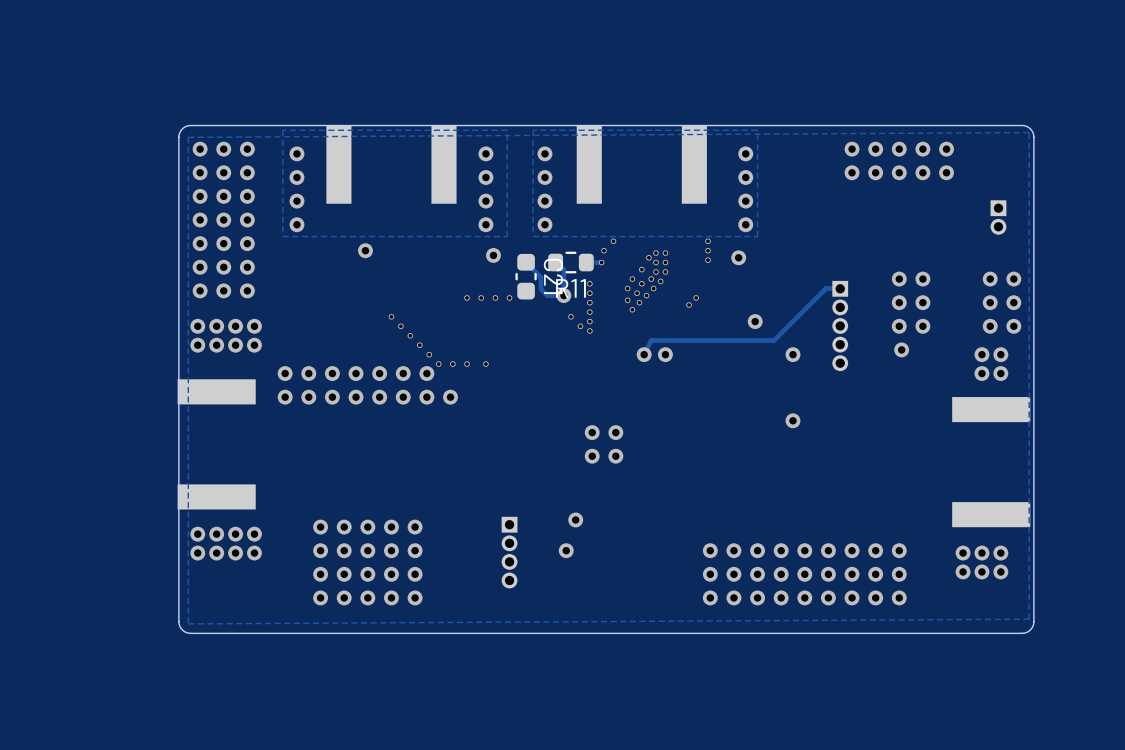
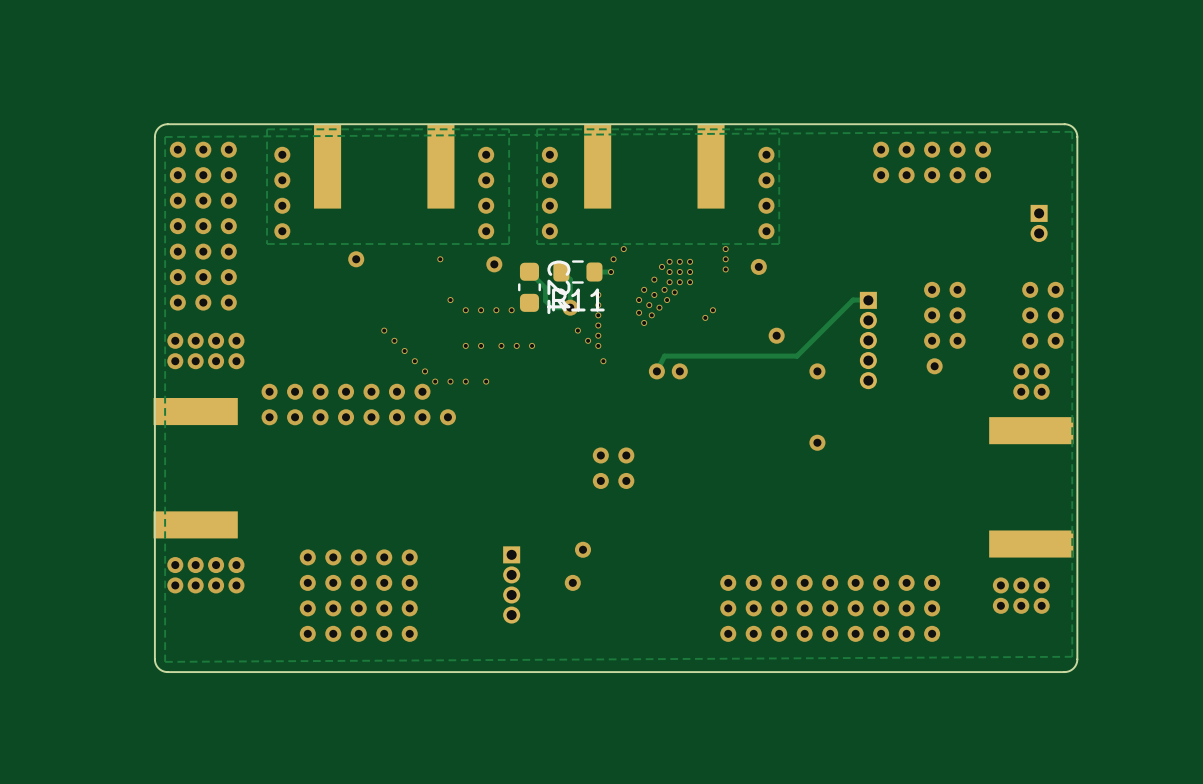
via: none -> (440, 259)
via: none -> (690, 261)
via: none -> (690, 272)
via: none -> (690, 282)
via: none -> (450, 300)
via: none -> (465, 345)
via: none -> (481, 345)
via: none -> (501, 345)
via: none -> (516, 345)
via: none -> (532, 345)
via: none -> (603, 361)

